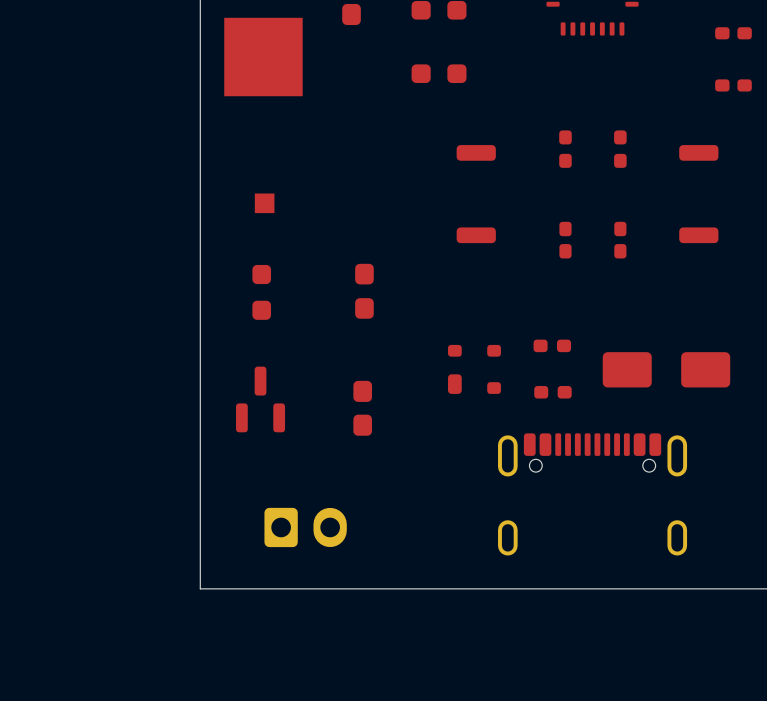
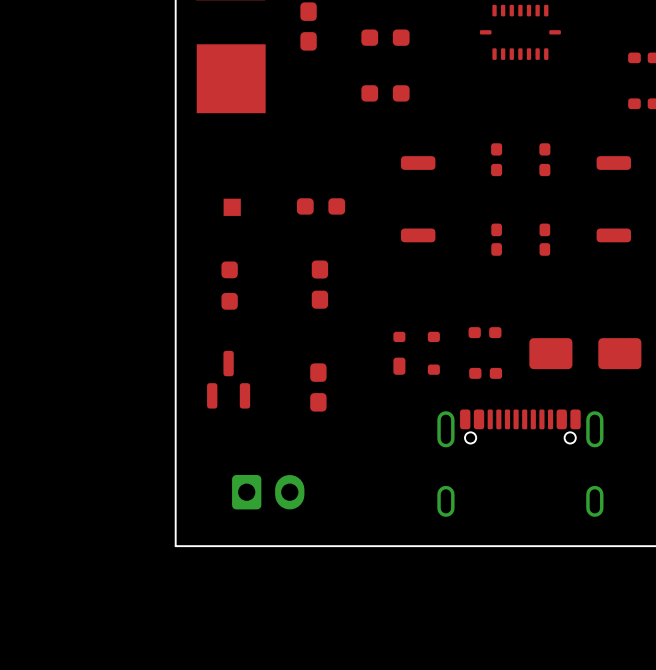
part: none -> (321, 206)

